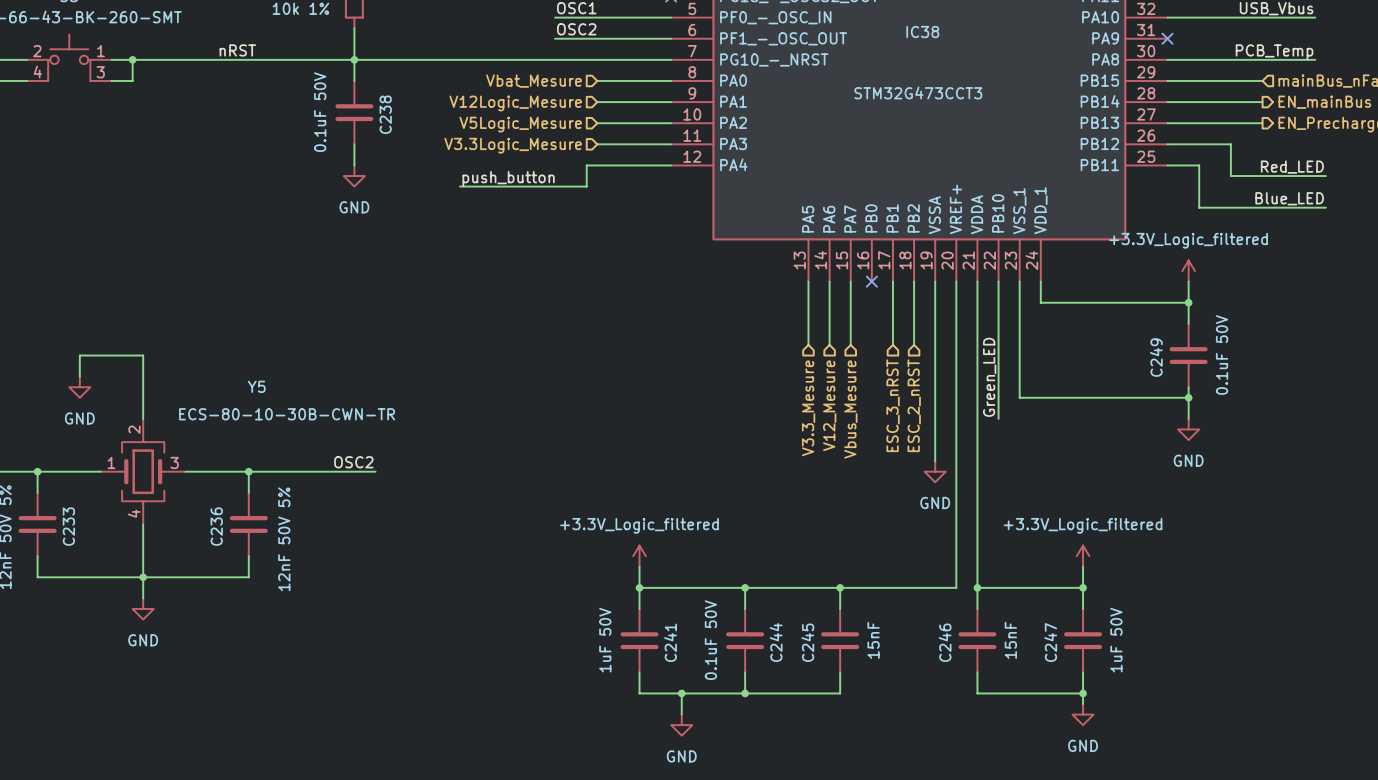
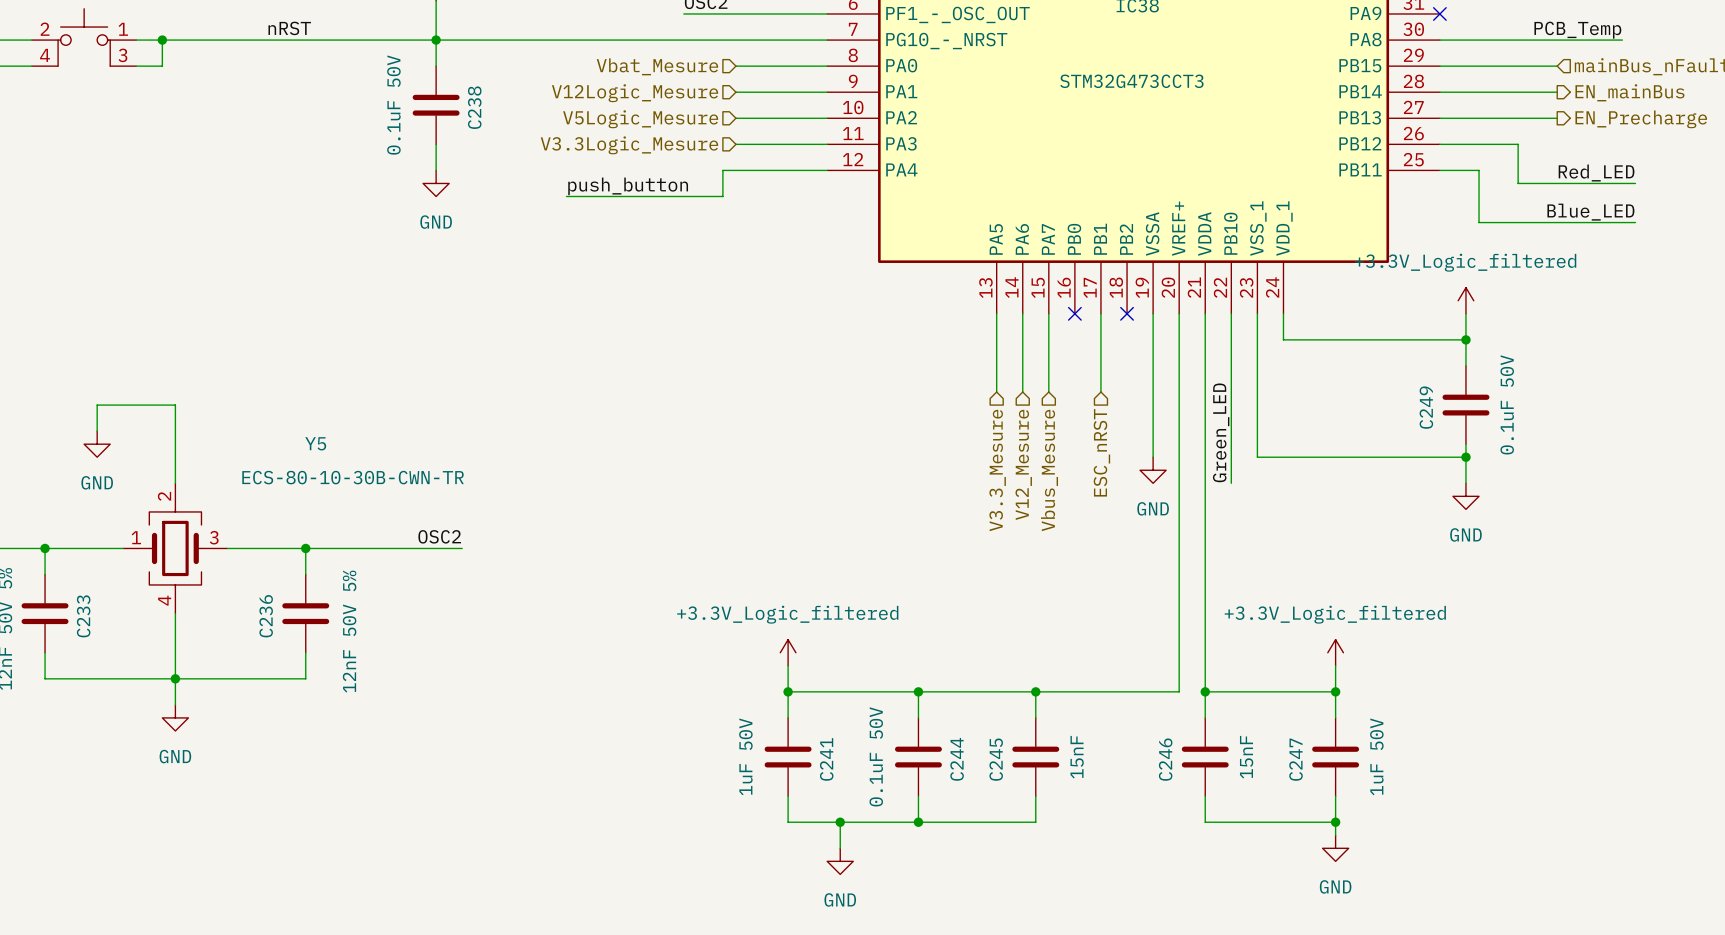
wire: (914, 281) (914, 344) -> none
no-connect mark: none -> (1127, 313)
wire: (935, 397) (935, 461) -> none
hierarchical label: ESC_3_nRST (893, 405) -> ESC_nRST (1101, 452)
hierarchical label: ESC_2_nRST (914, 405) -> none
power symbol position: GND (935, 471) -> GND (1153, 470)

